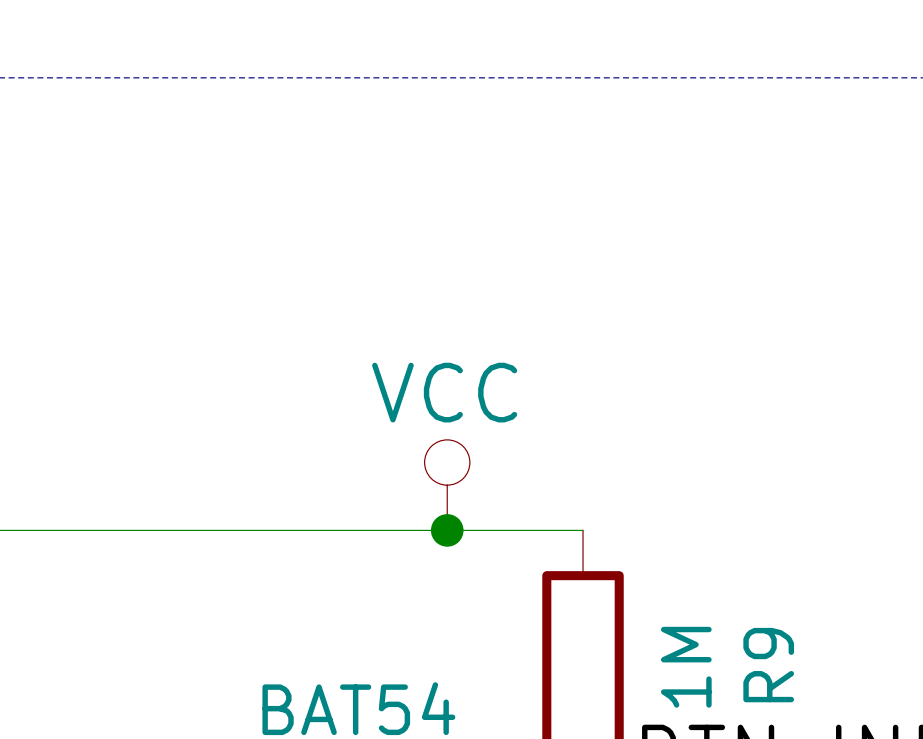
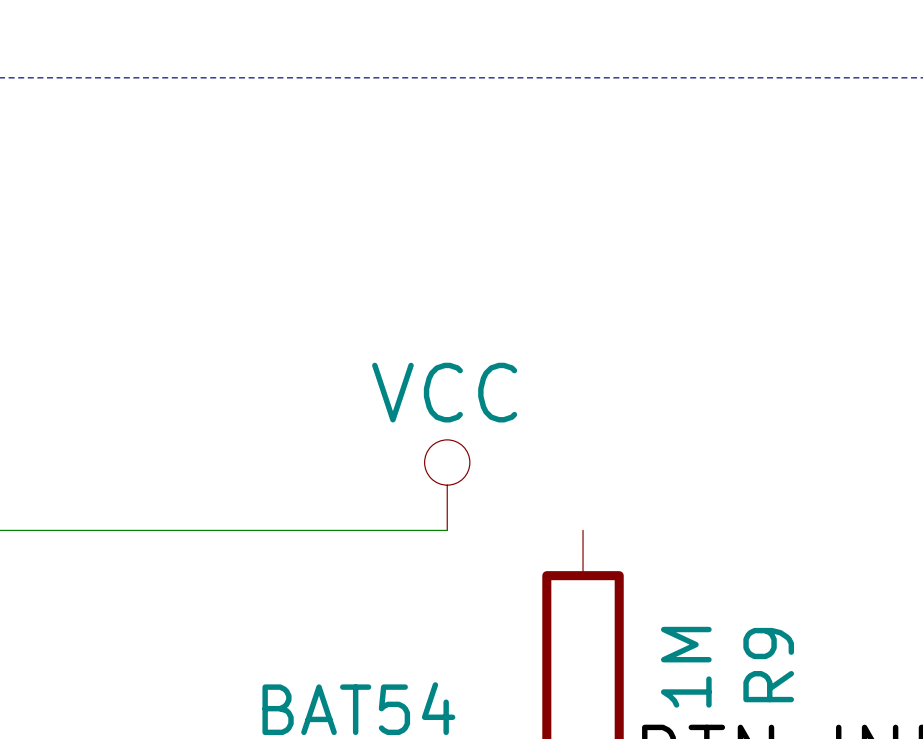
wire: (447, 530) (583, 530) -> none
junction: (447, 530) -> none

